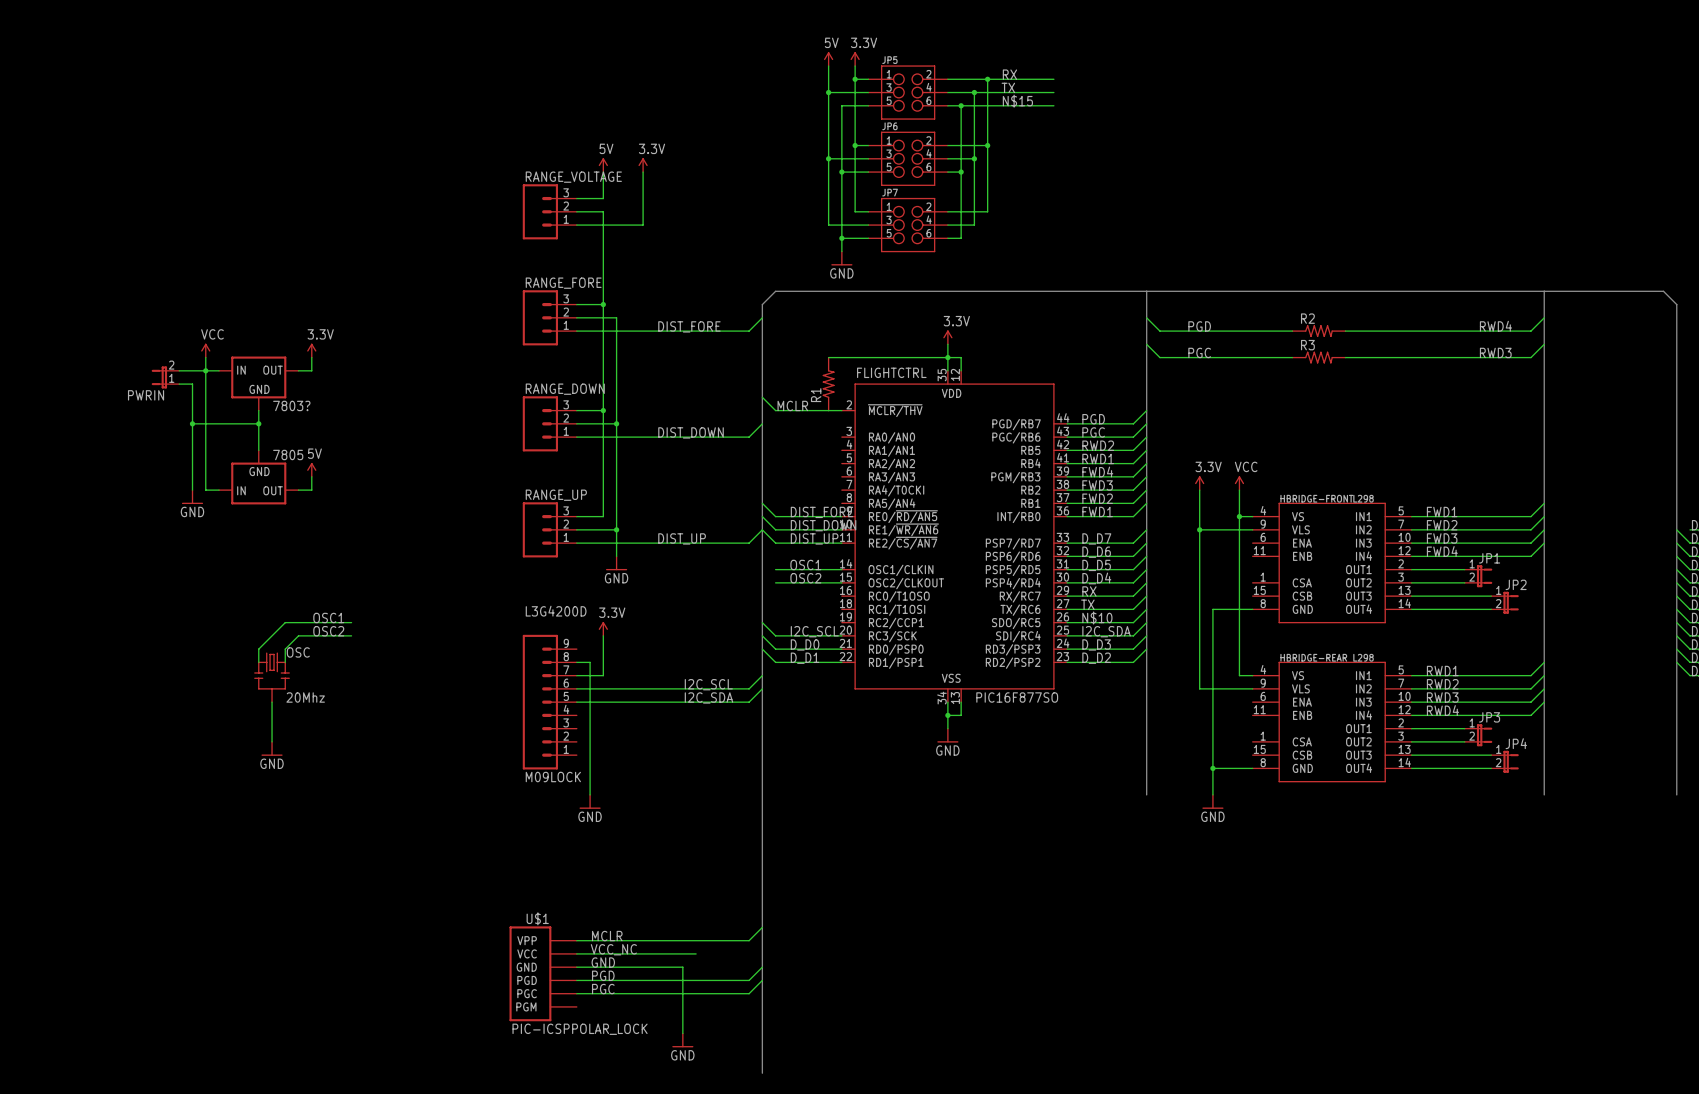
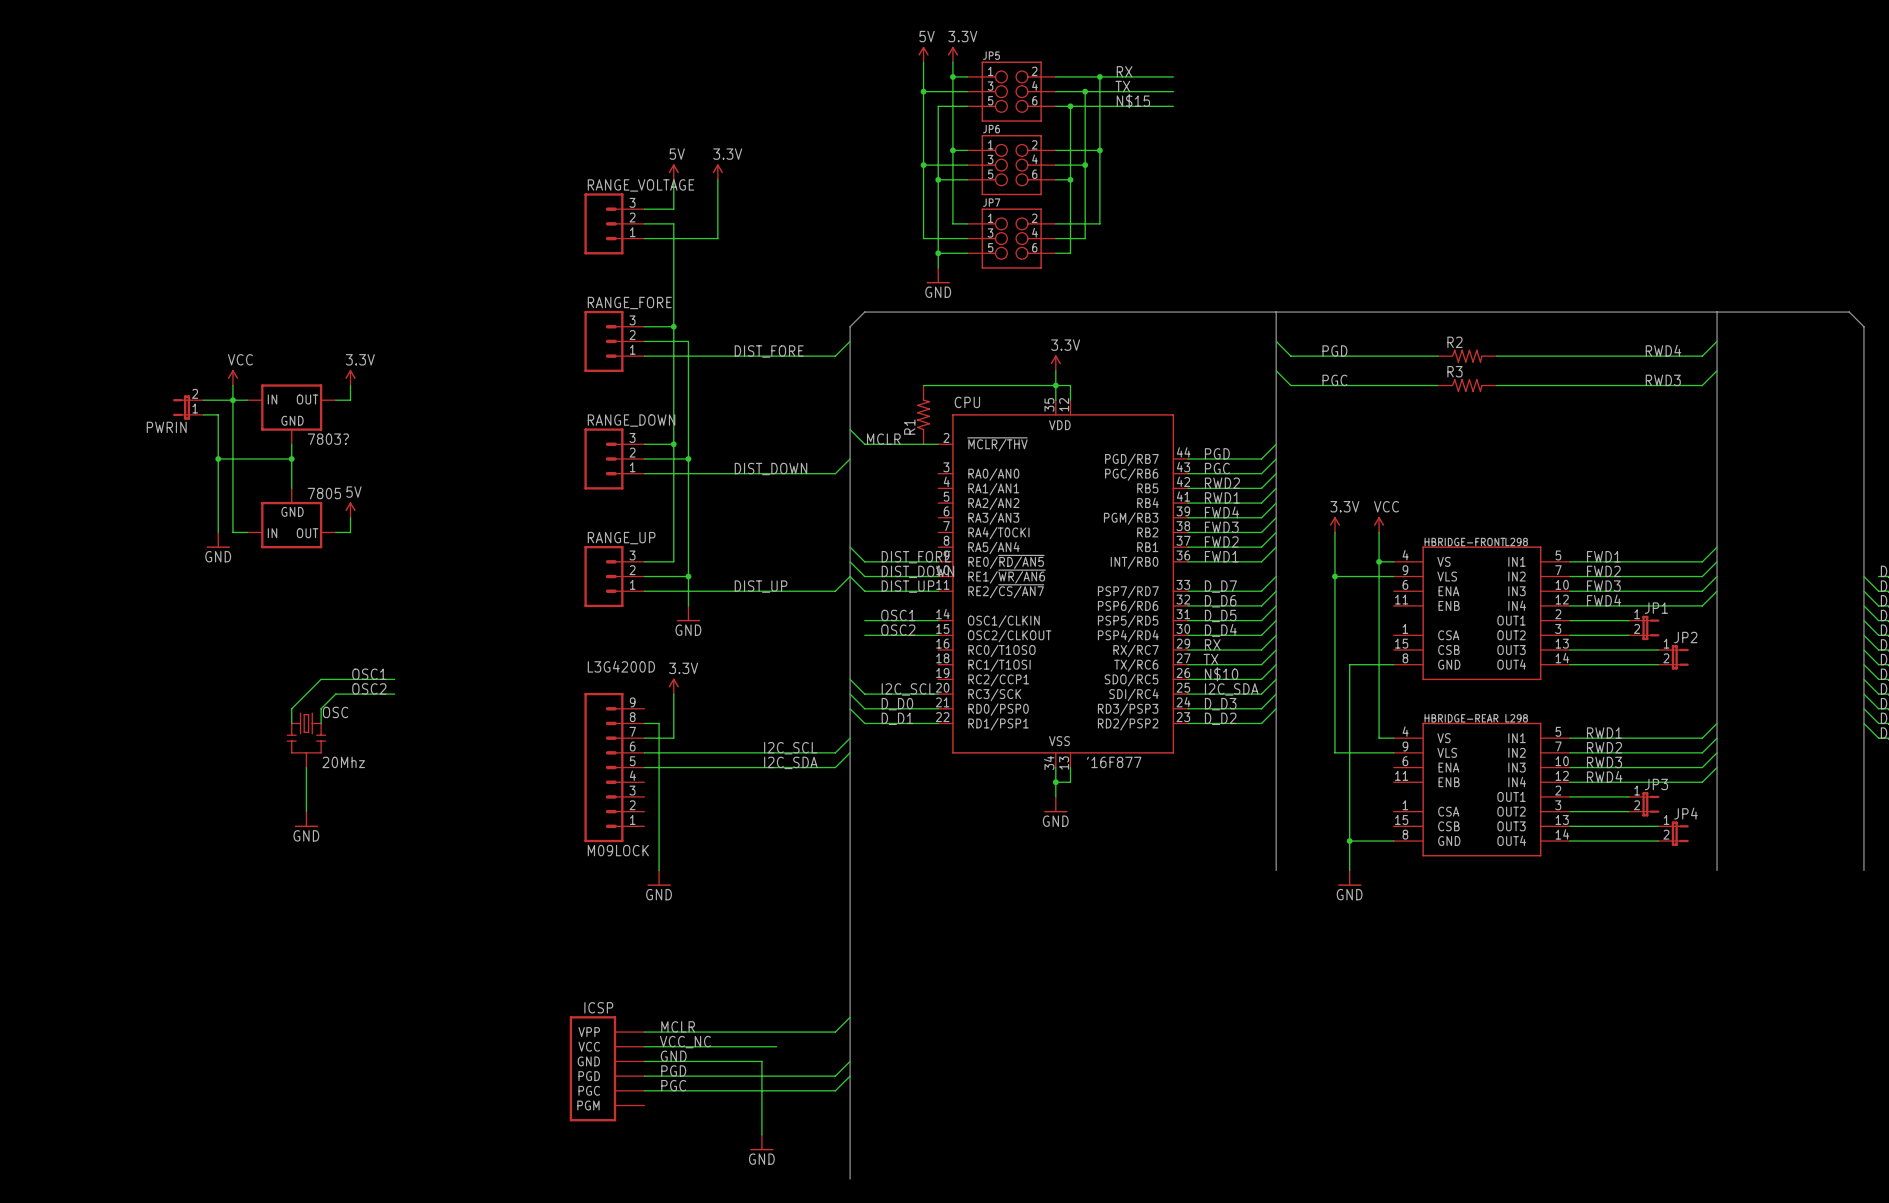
FLIGHTCTRL name: FLIGHTCTRL (891, 372) -> CPU (967, 402)
FLIGHTCTRL value: PIC16F877SO (1017, 697) -> '16F877 (1114, 762)
U$1 name: U$1 (537, 918) -> ICSP (598, 1007)
U$1 value: PIC-ICSPPOLAR_LOCK (580, 1029) -> none

